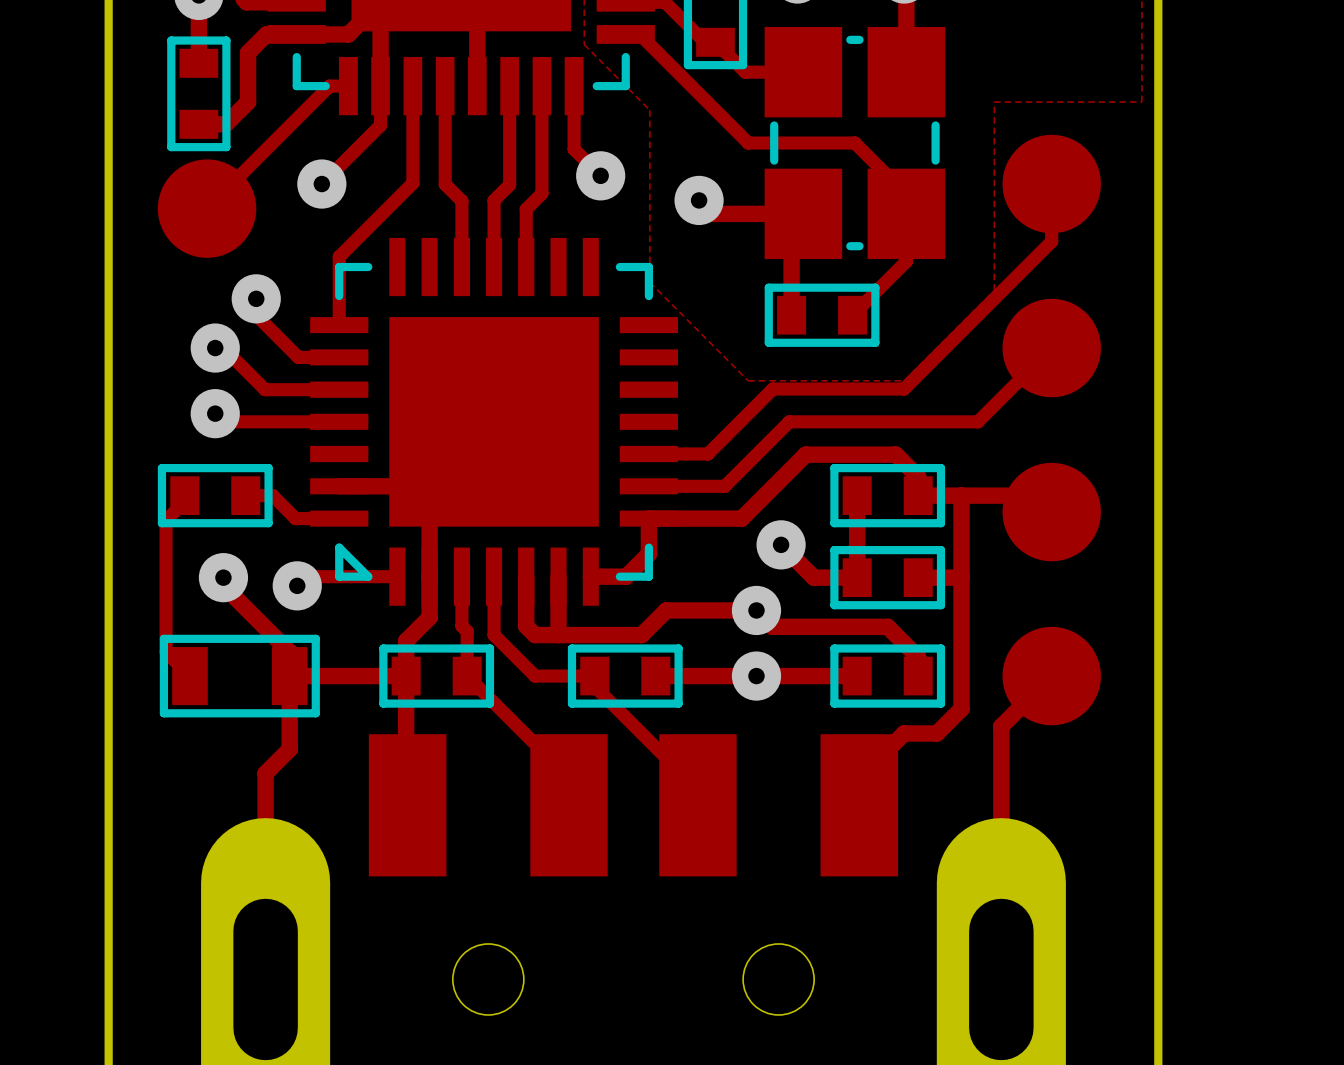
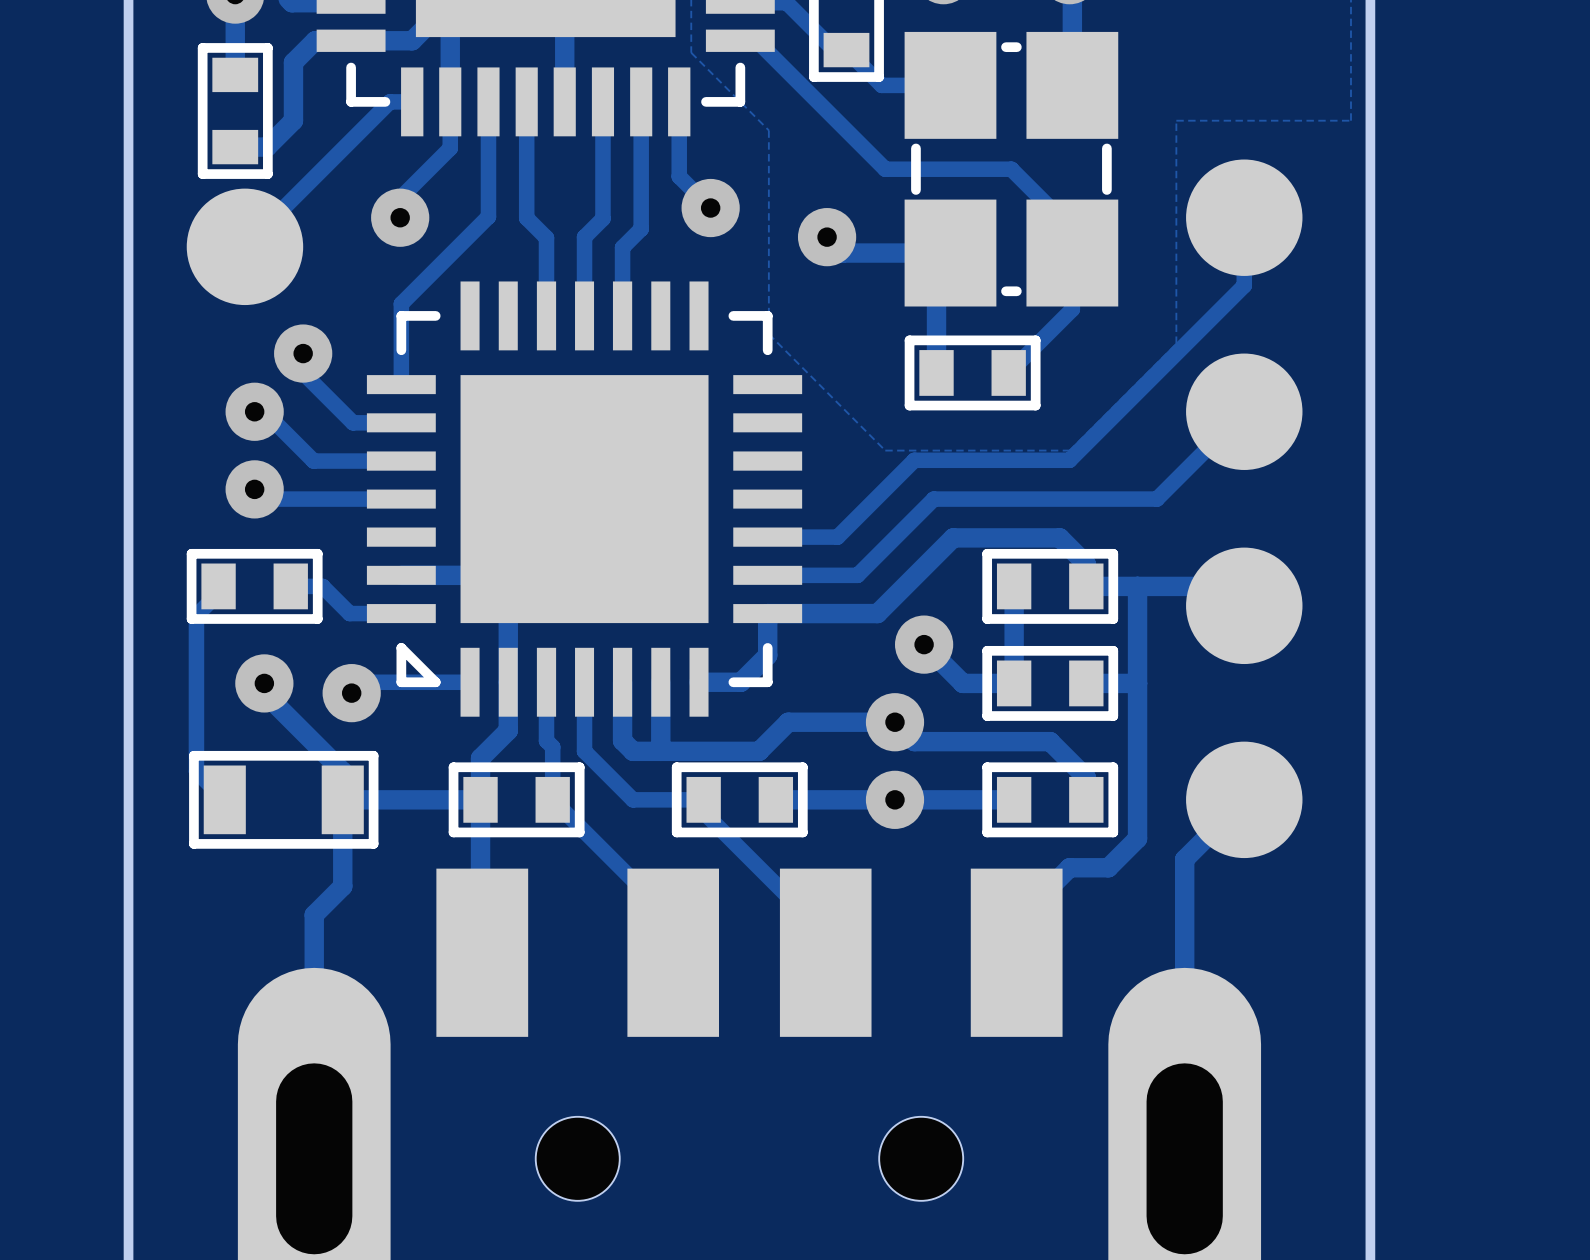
via position: (321, 184) -> (400, 217)

